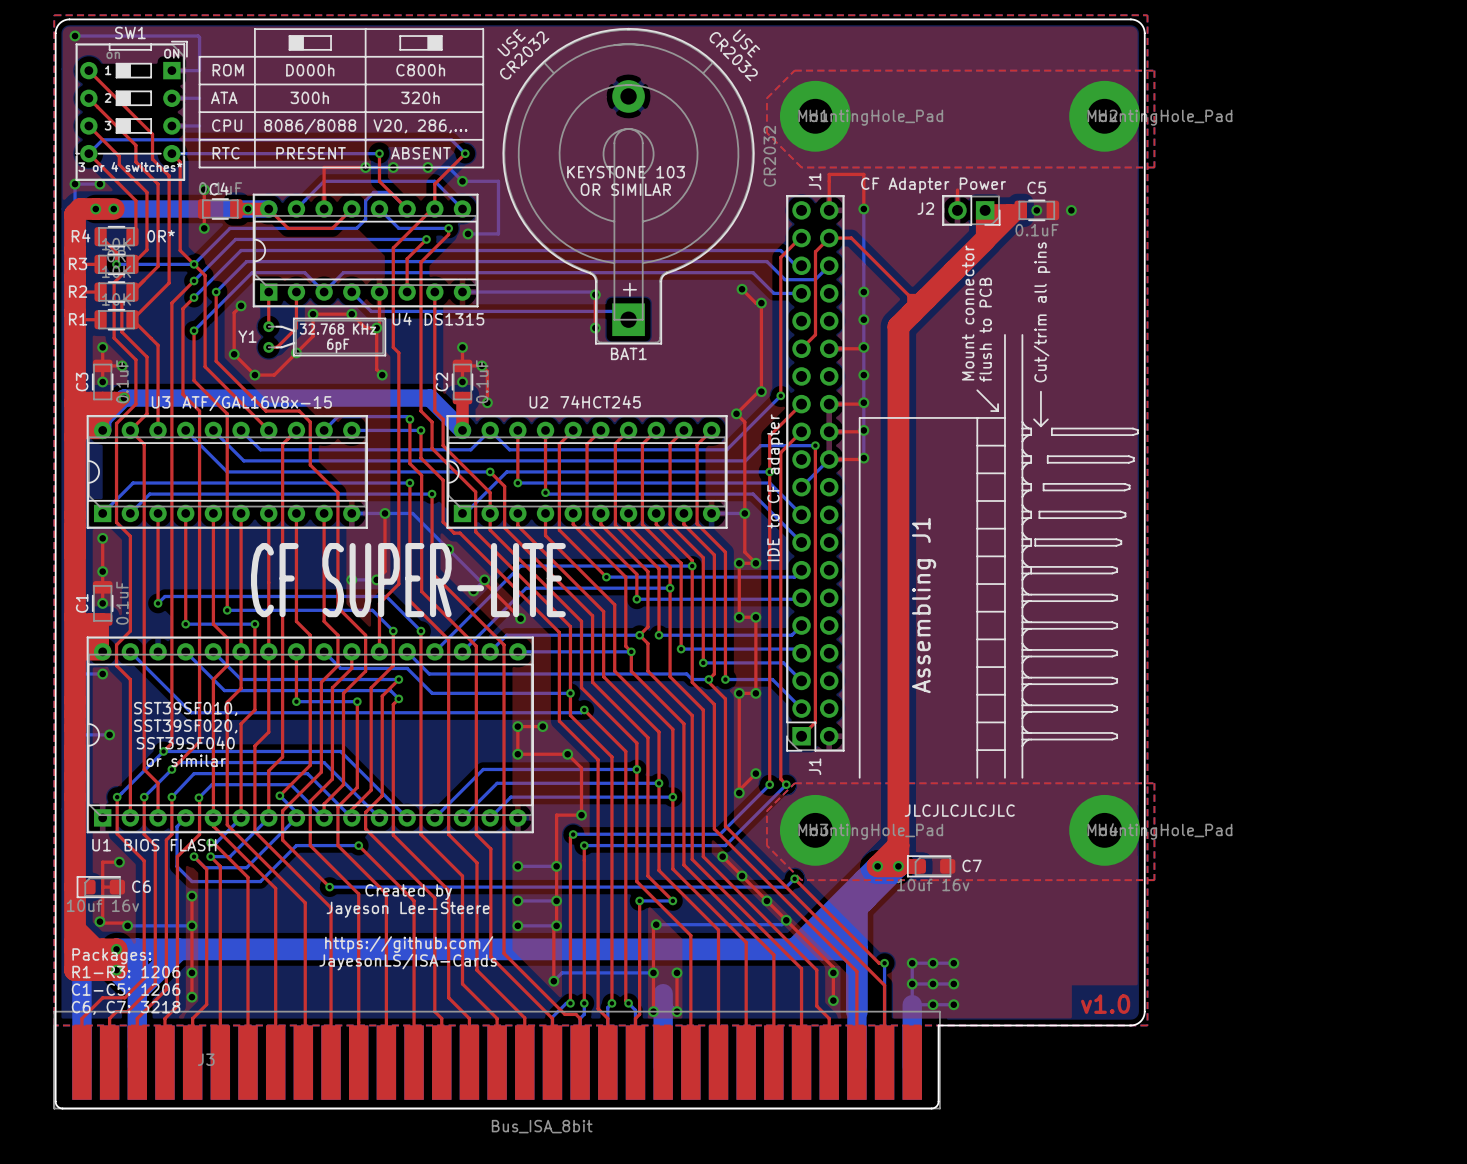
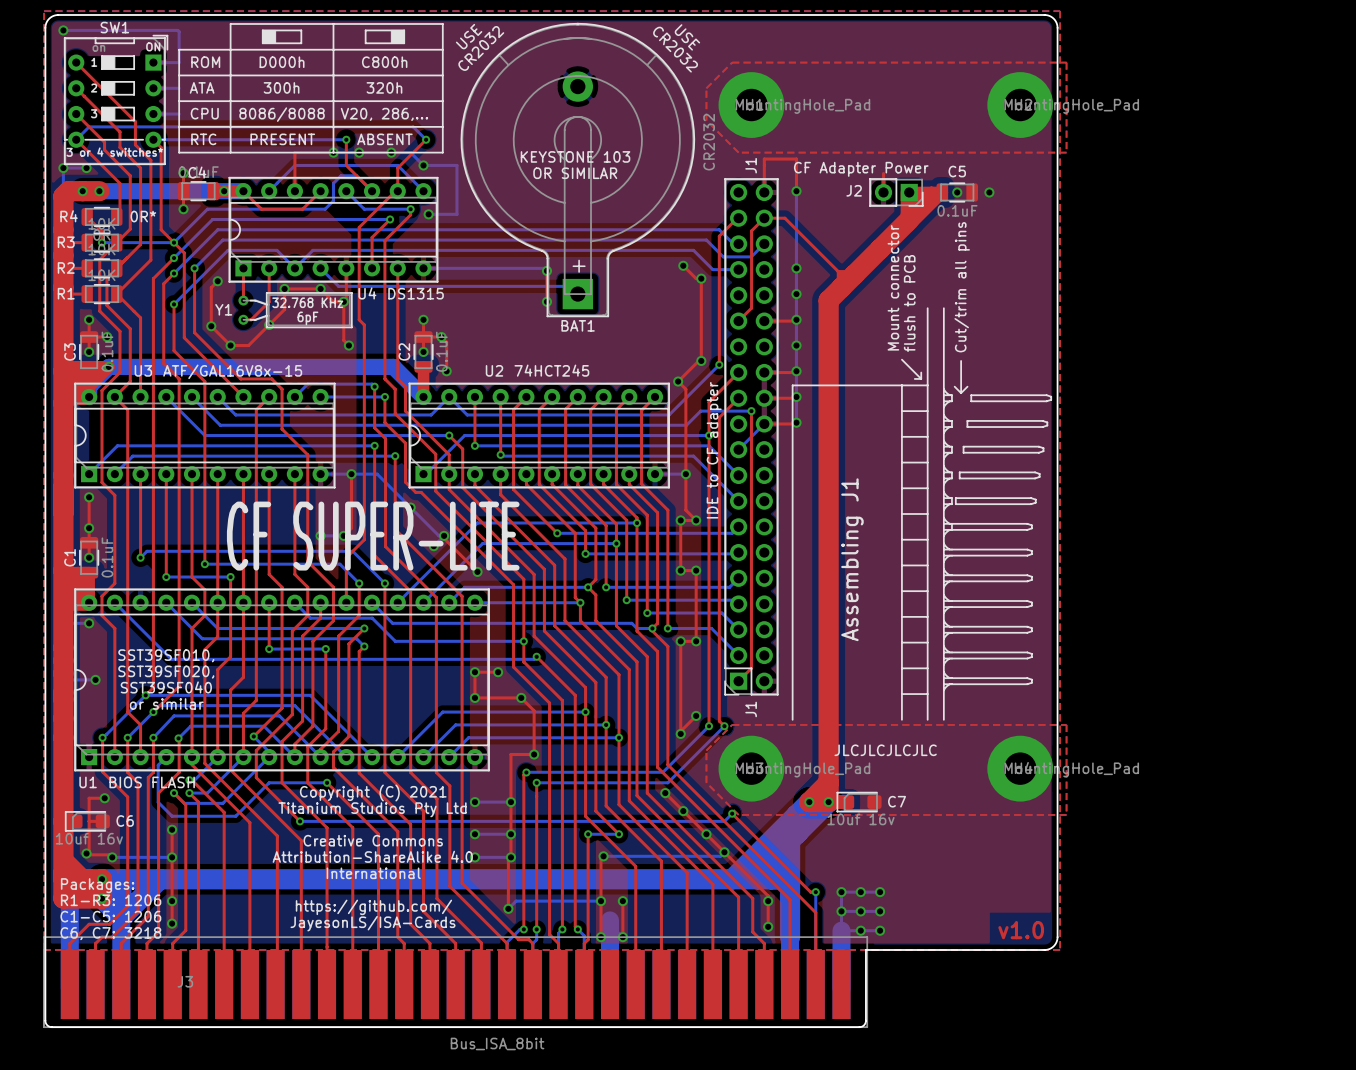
text: none -> Copyright (C) 2021 (373, 793)
text: none -> Titanium Studios Pty Ltd (372, 809)
text: Created by (408, 892) -> none
text: Jayeson Lee-Steere (408, 909) -> Creative Commons (373, 840)
text: none -> Attribution-ShareAlike 4.0 (372, 856)
text: https://github.com/ (409, 944) -> International (373, 873)
text position: JayesonLS/ISA-Cards (408, 962) -> JayesonLS/ISA-Cards (372, 923)
text: none -> https://github.com/ (373, 907)

